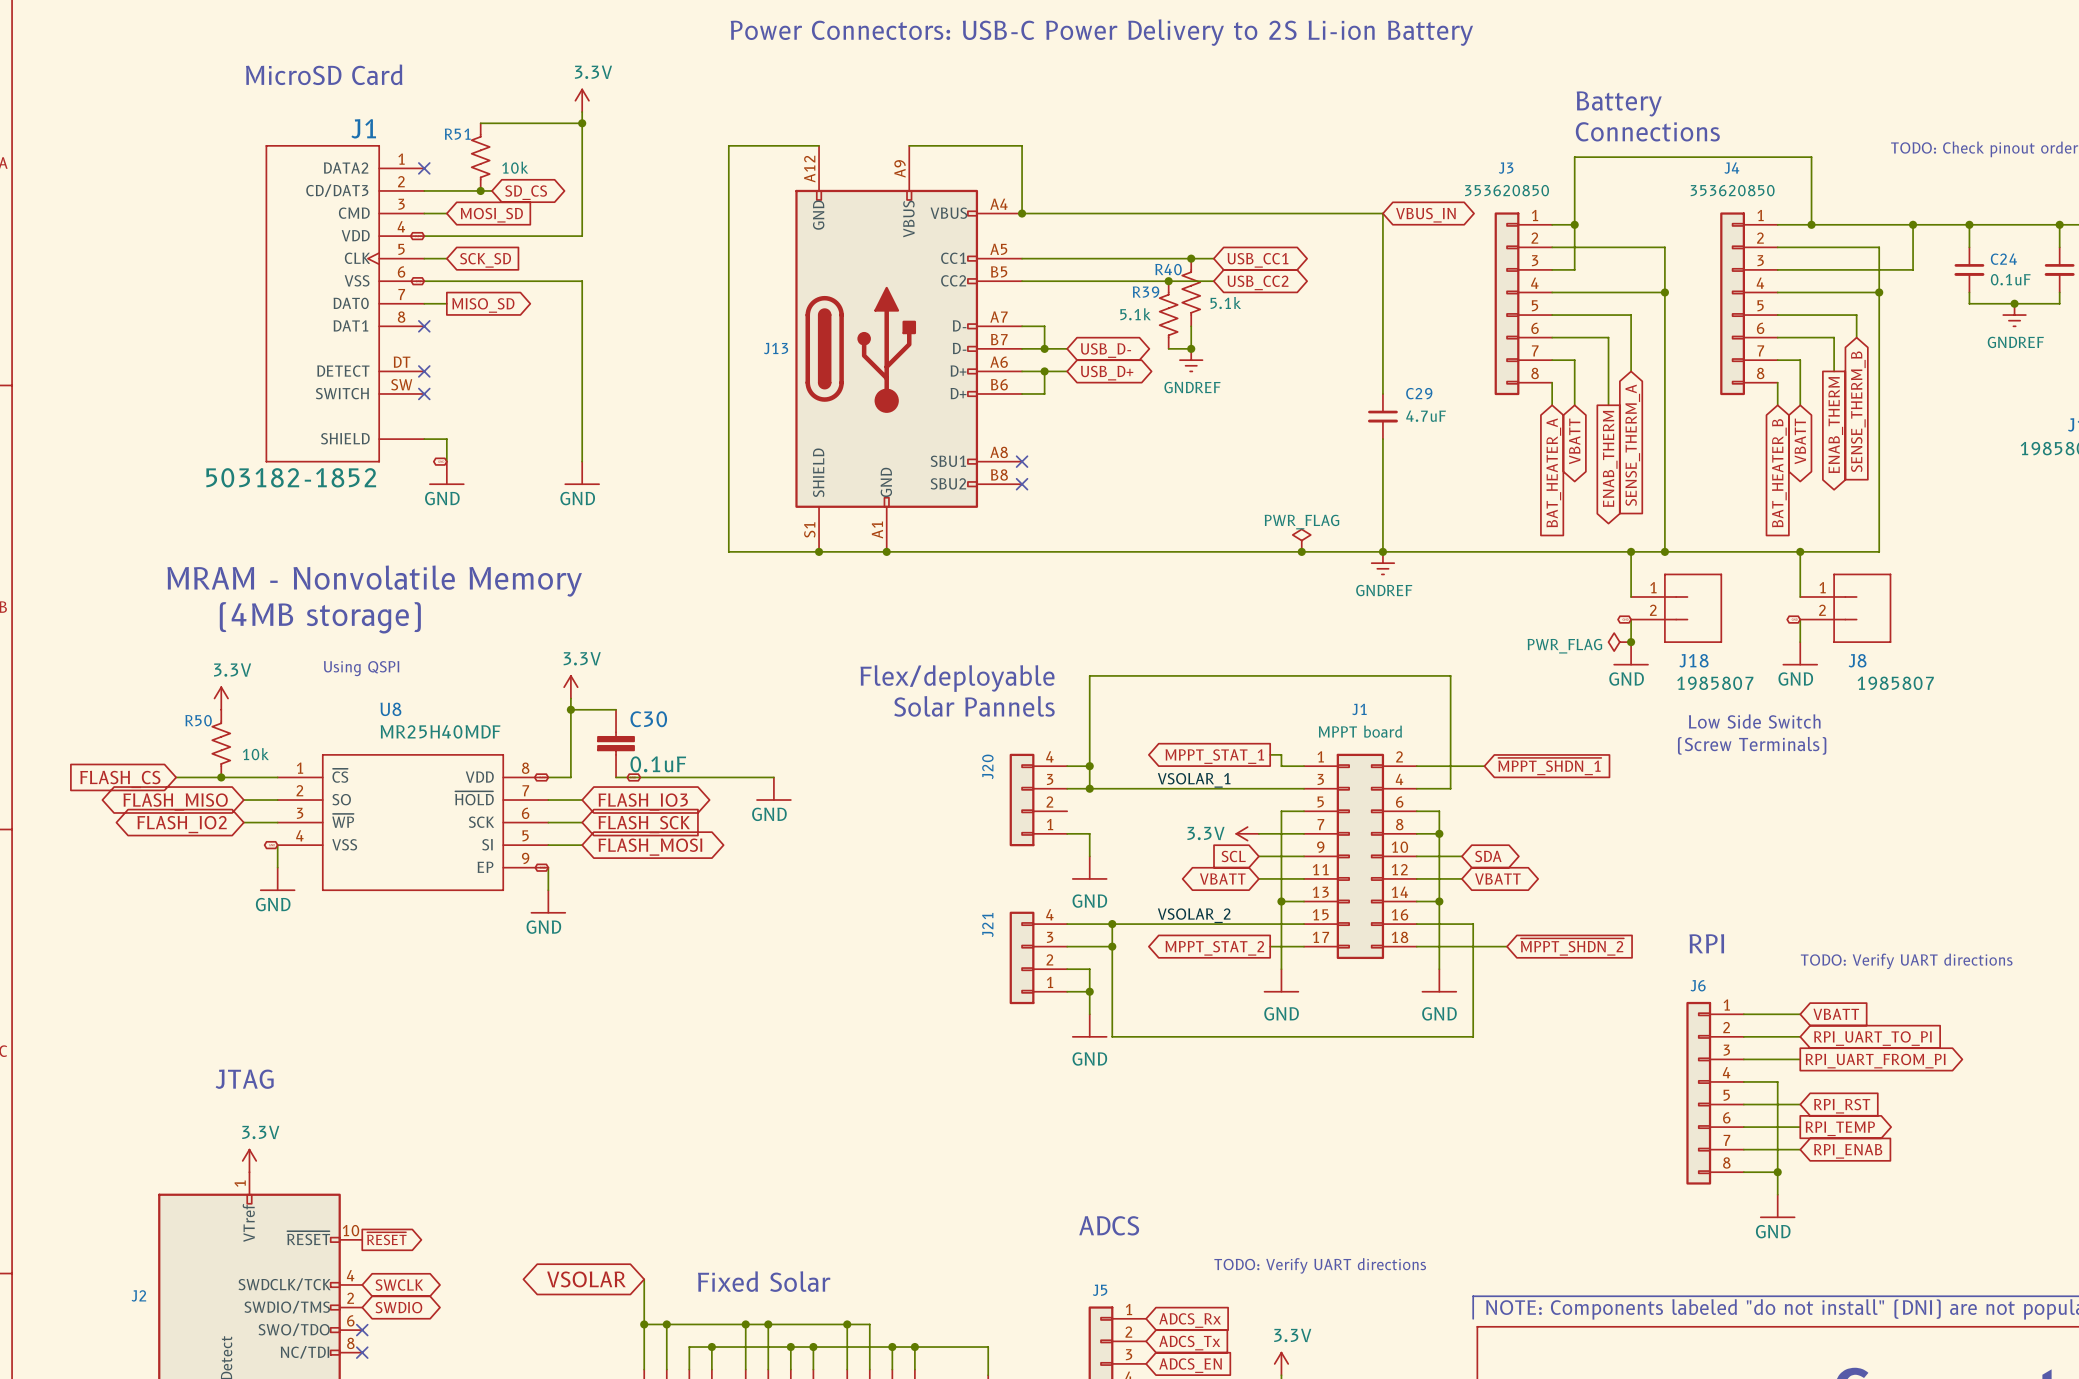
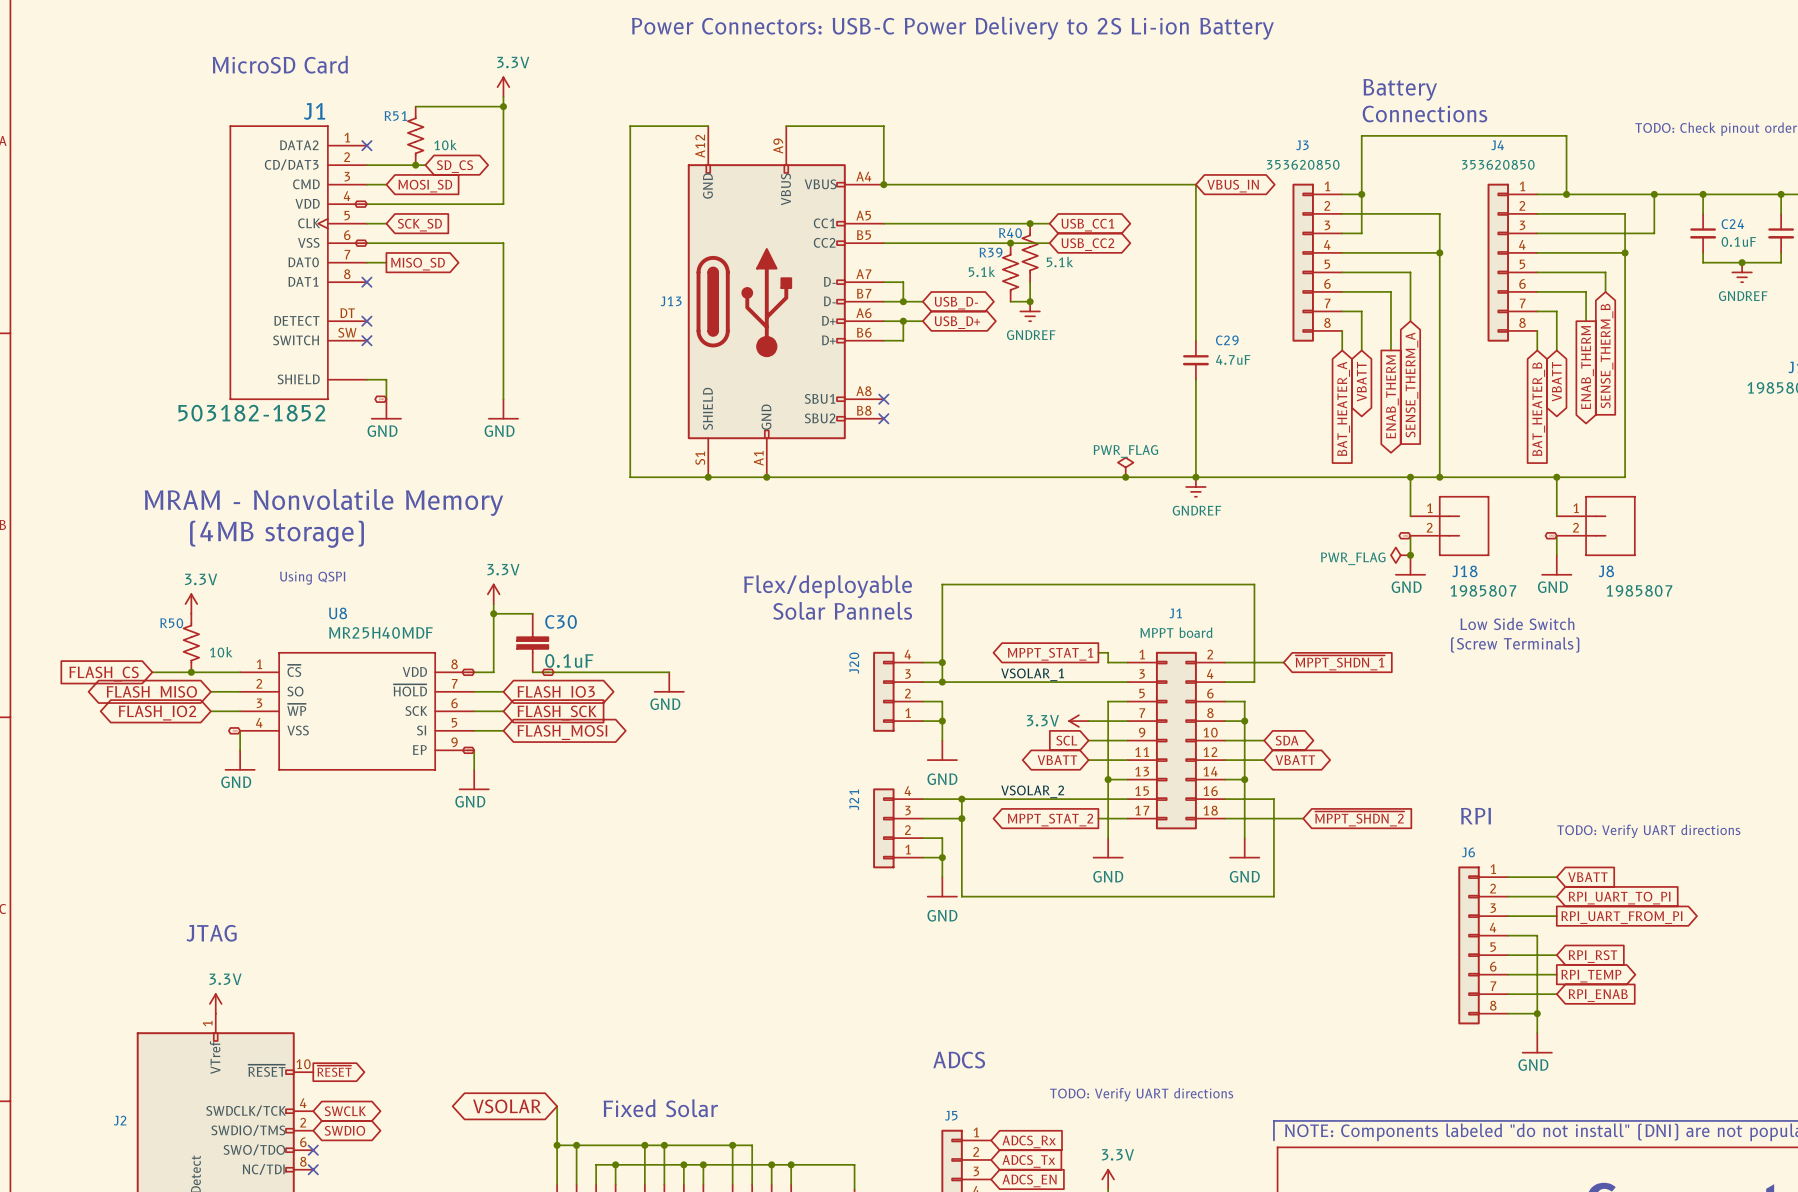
wire: none -> (922, 701) (942, 701) (942, 721)
junction: none -> (942, 721)

